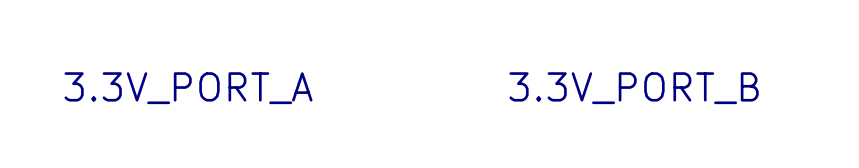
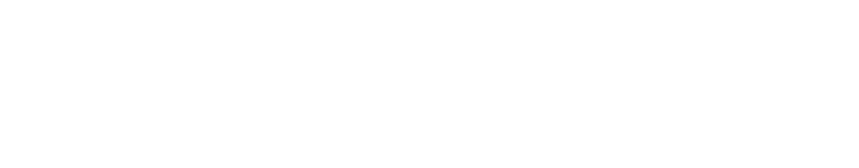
text: 3.3V_PORT_A (188, 88) -> none
text: 3.3V_PORT_B (634, 88) -> none

